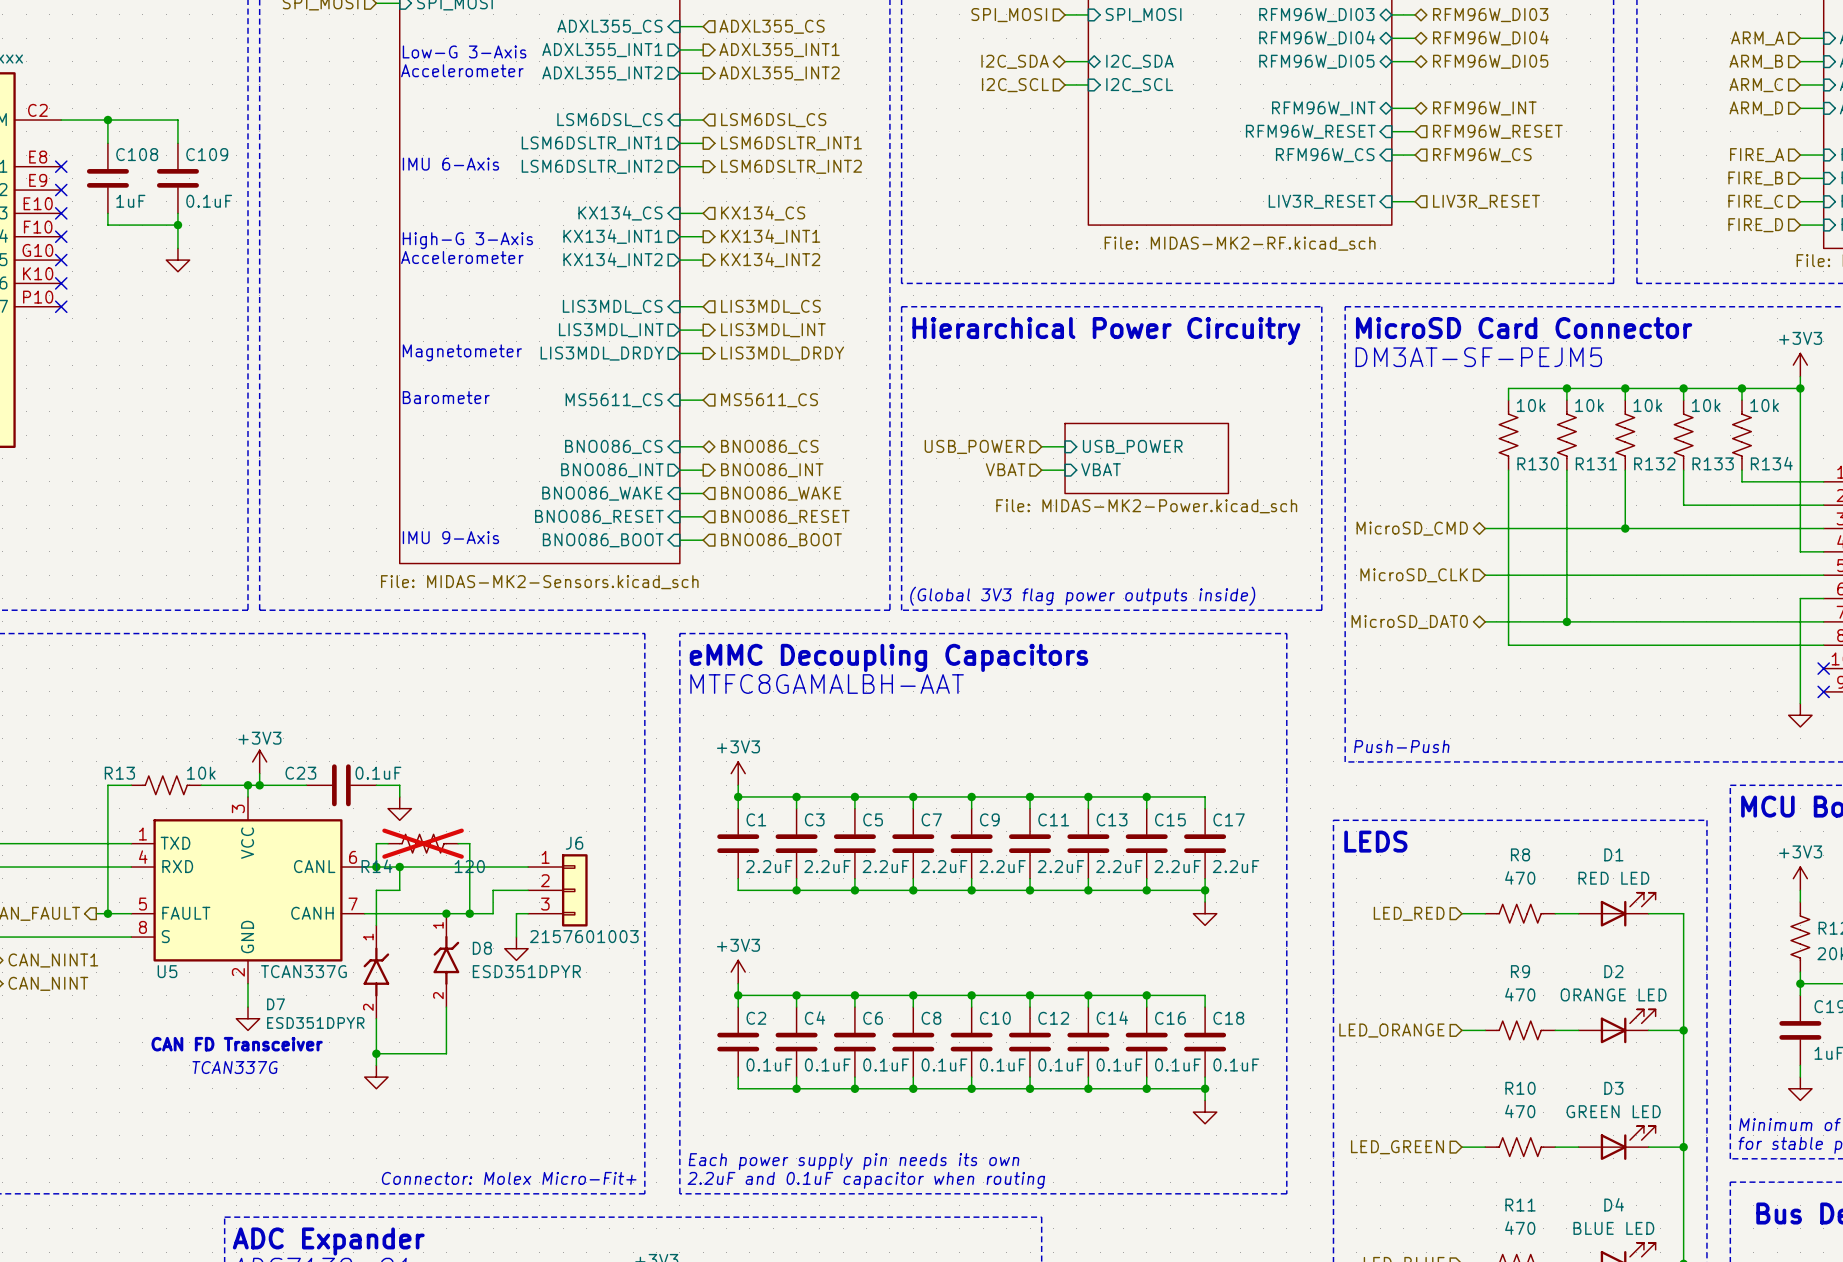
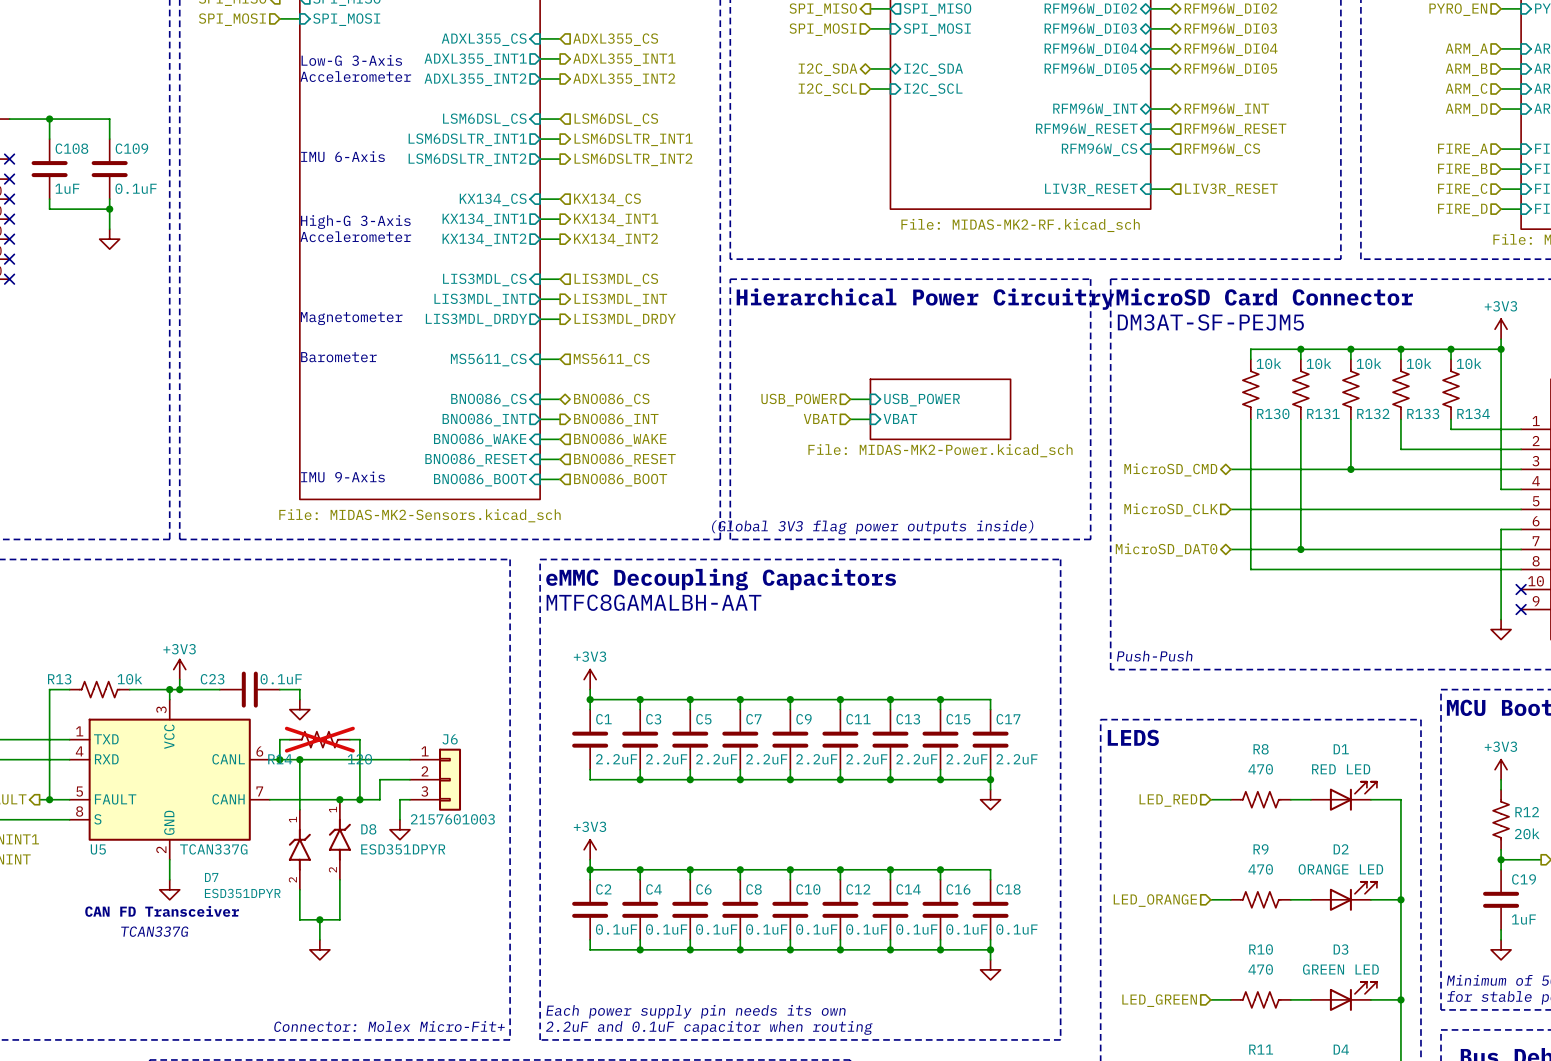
wire: (399, 890) (376, 890) (376, 925) -> (299, 779) (299, 809)
D7 position: (376, 972) -> (299, 849)
wire: (376, 1018) (376, 1065) -> none
wire: (376, 1053) (399, 1053) -> (299, 889) (299, 919)
junction position: (376, 1053) -> (319, 919)
wire: none -> (319, 919) (319, 939)
power symbol position: (376, 1077) -> (319, 949)

